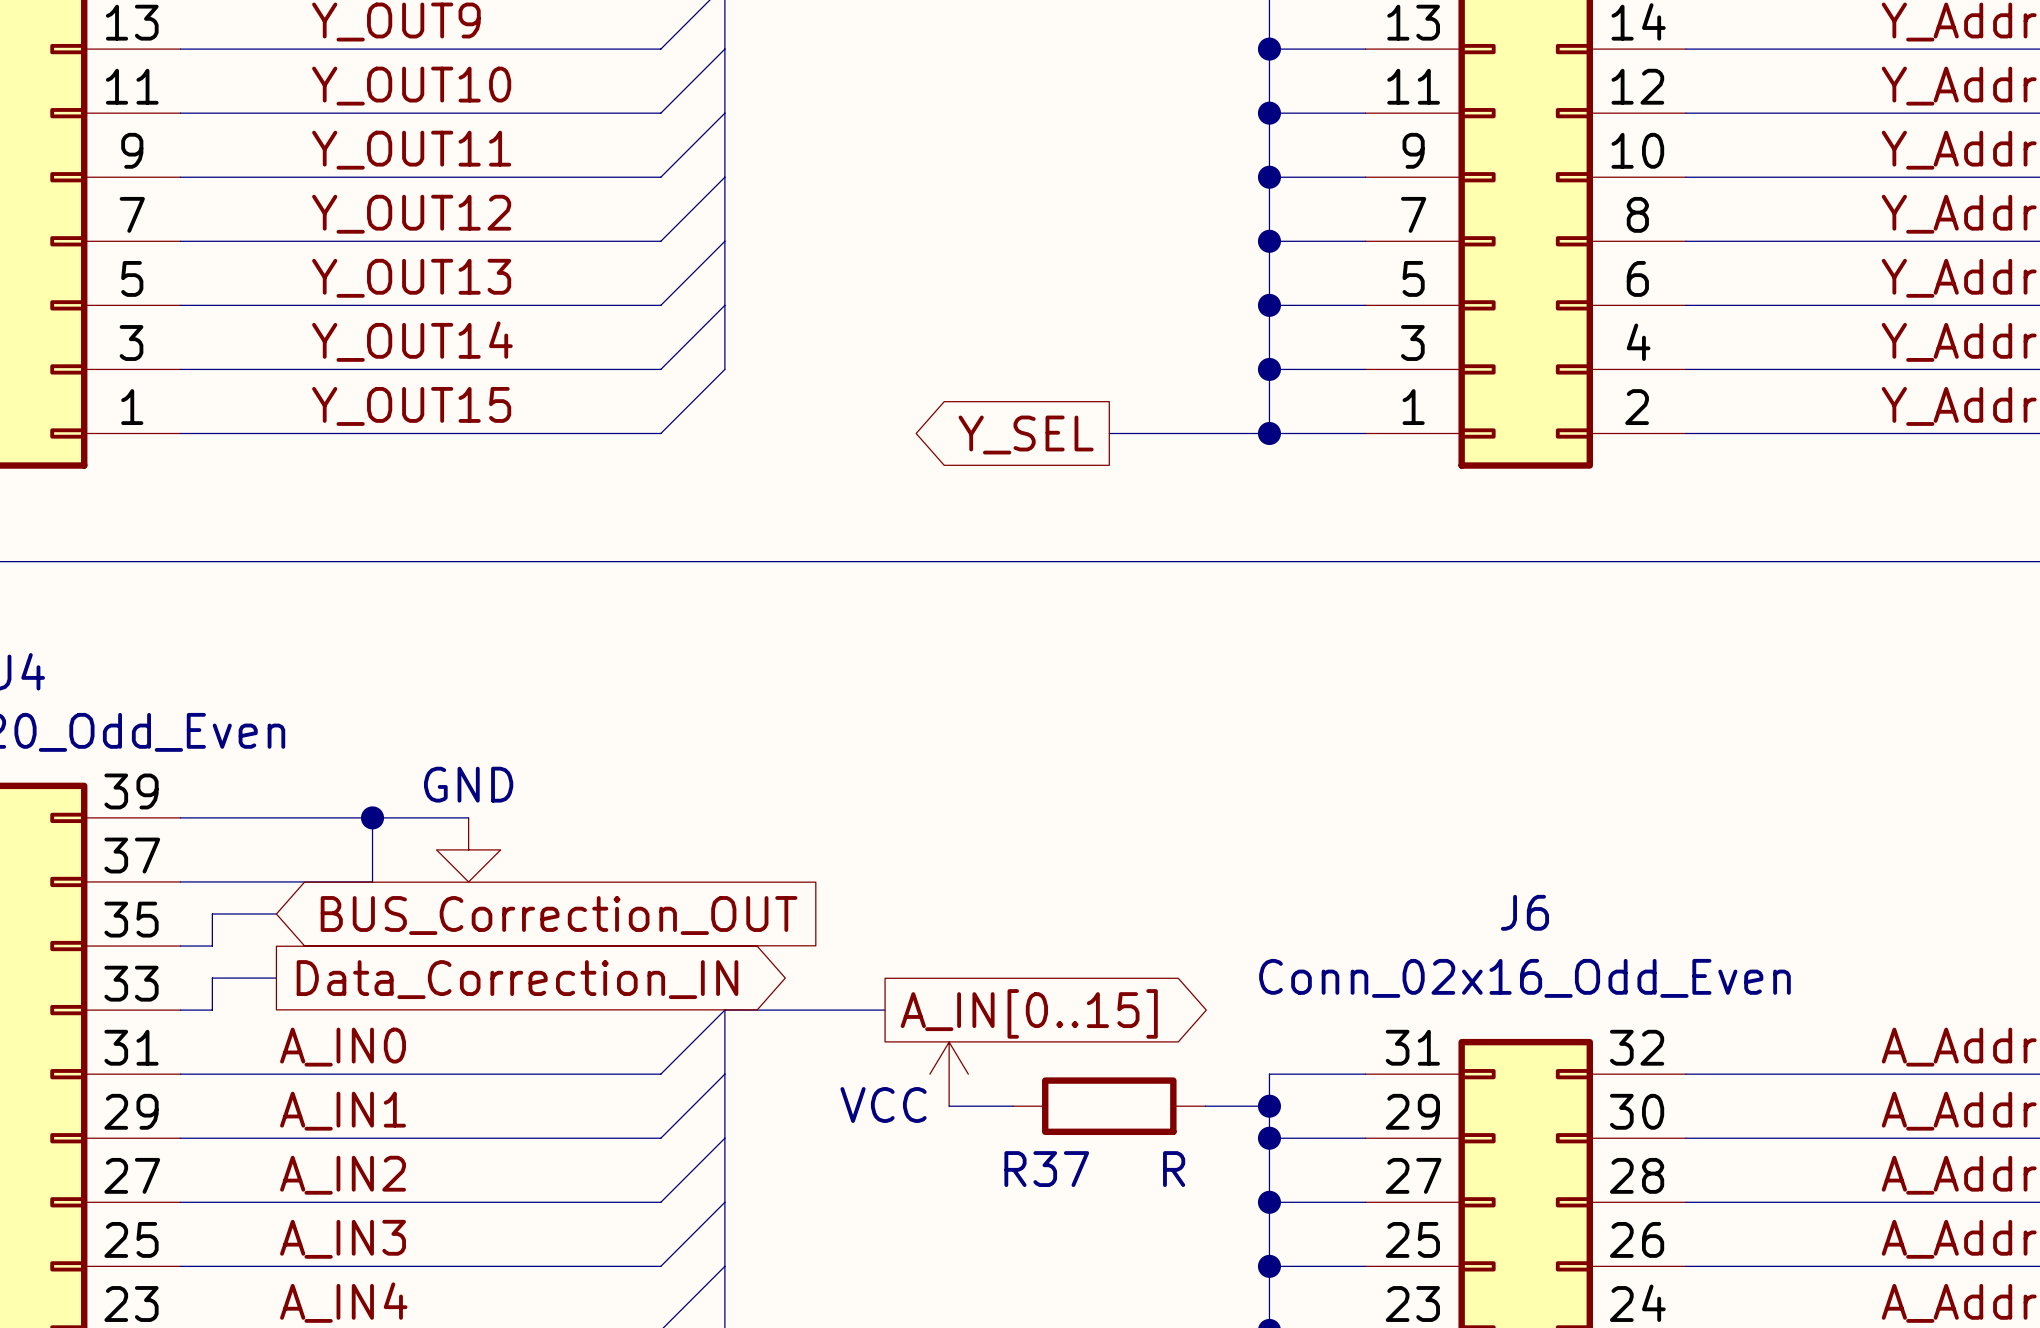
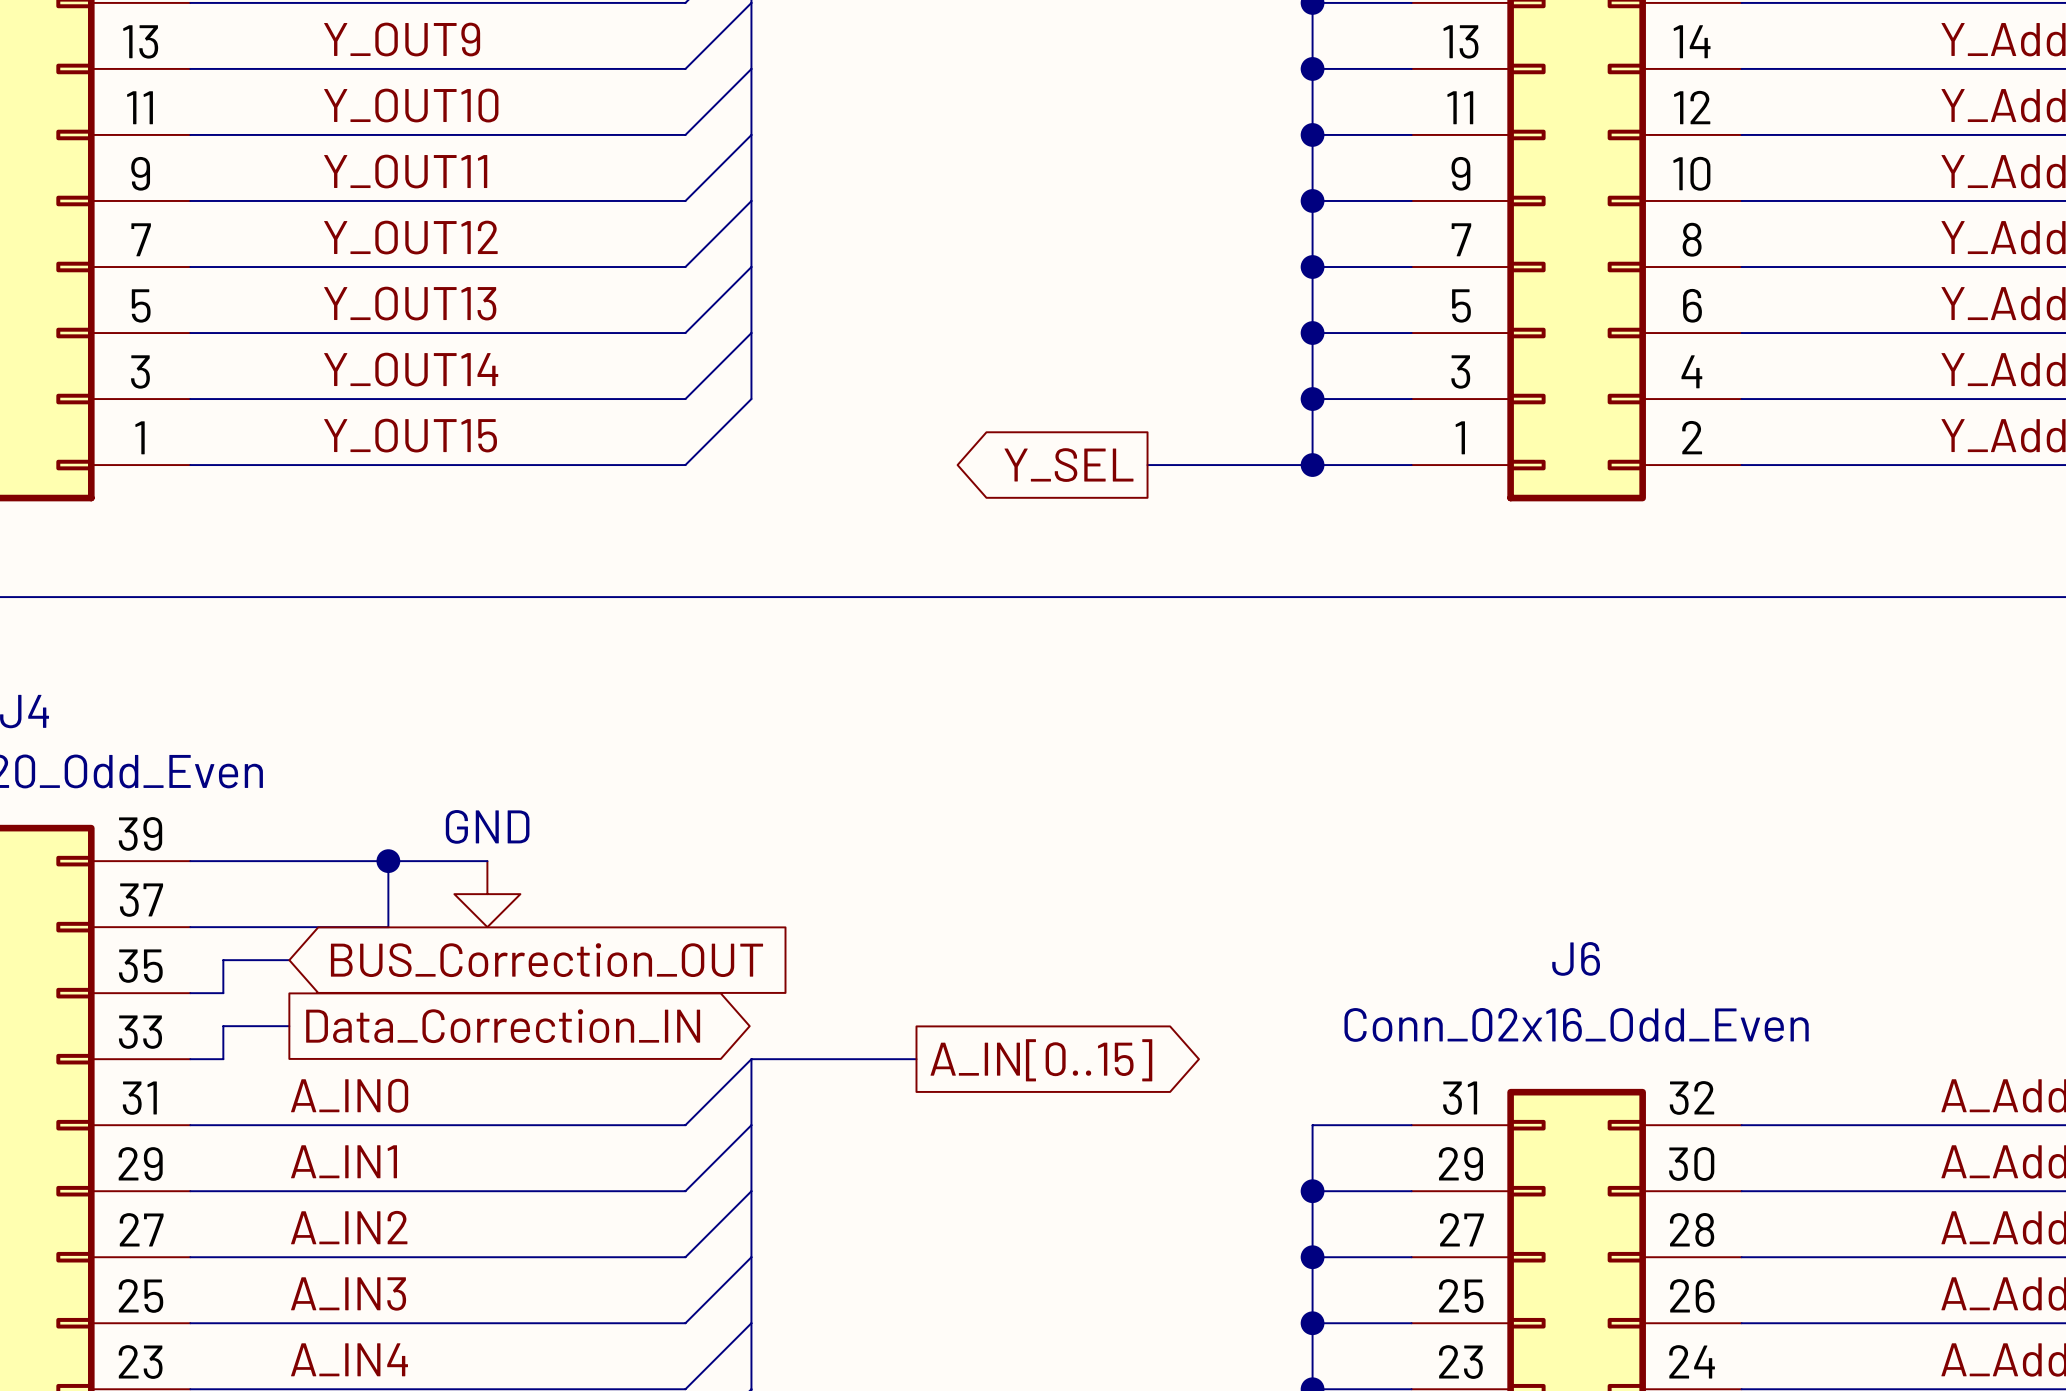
power symbol: VCC (949, 1074) -> none
wire: (949, 1106) (1013, 1106) -> none
R37: R (1109, 1106) -> none
wire: (1205, 1106) (1269, 1106) -> none
junction: (1269, 1106) -> none

